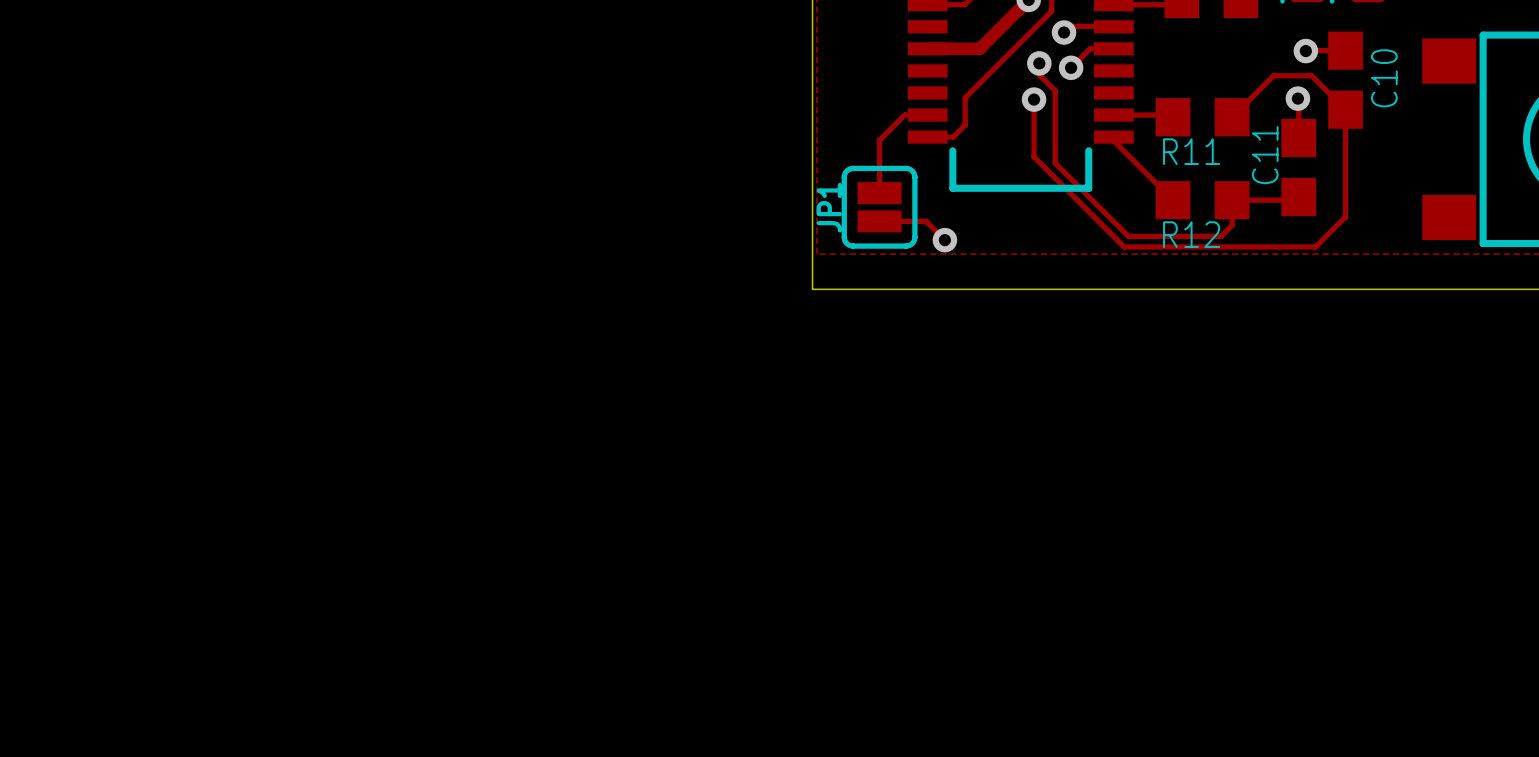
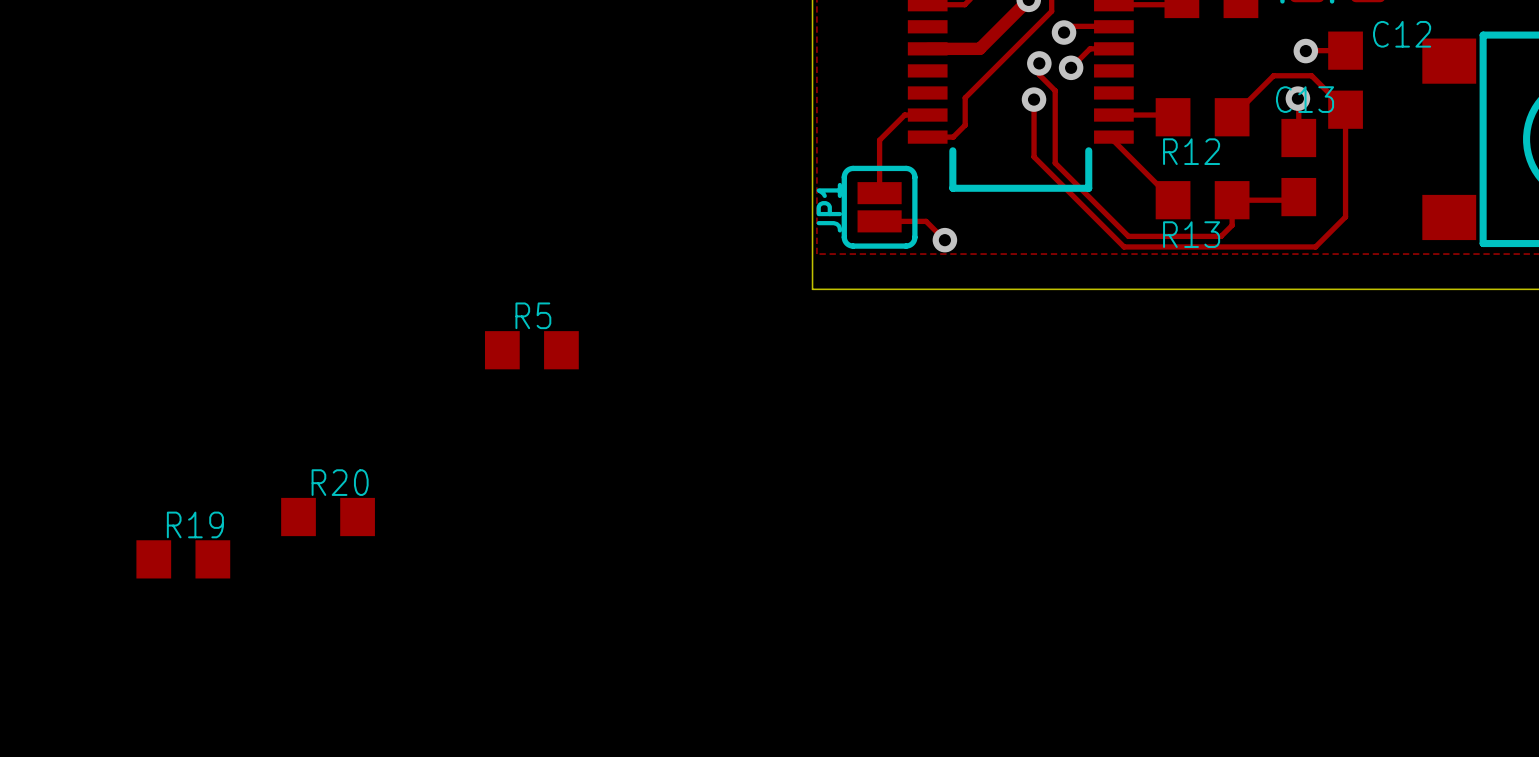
C10 name: C10 (1384, 78) -> C12 (1402, 34)
R11 name: R11 (1191, 151) -> R12 (1191, 151)
C11 name: C11 (1265, 155) -> C13 (1305, 99)
R12 name: R12 (1191, 234) -> R13 (1191, 234)
R5: none -> (531, 350)
R20: none -> (328, 517)
R19: none -> (183, 559)

